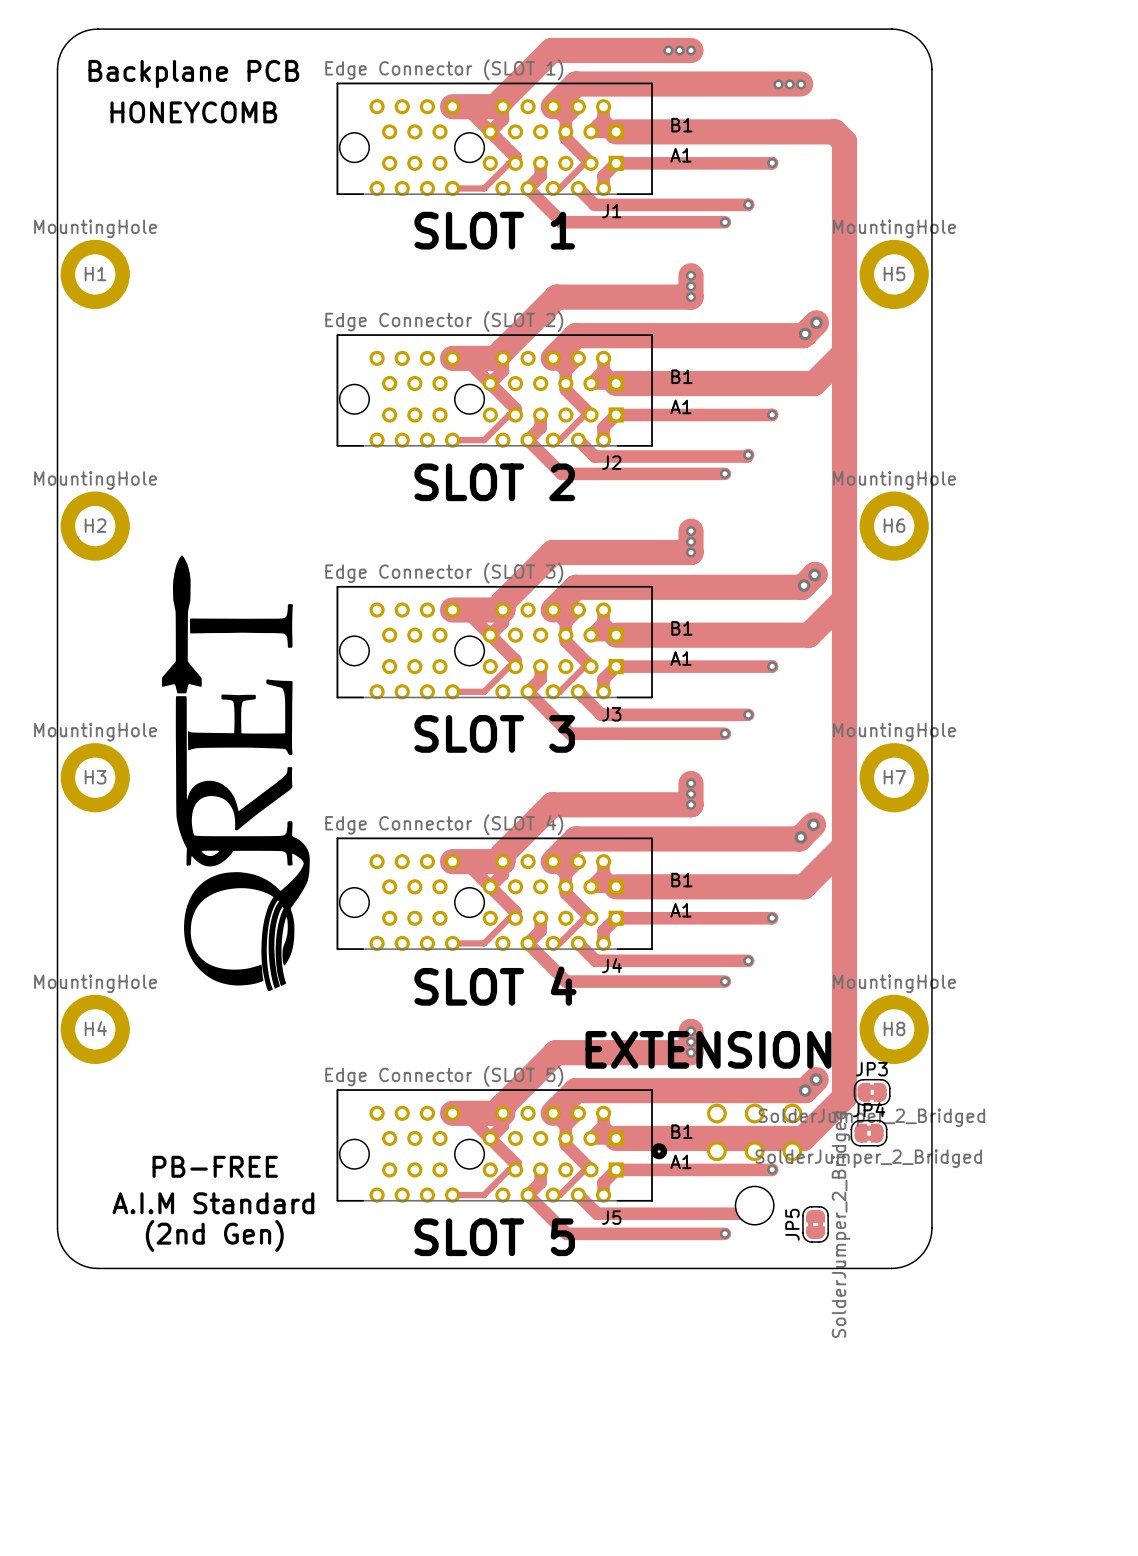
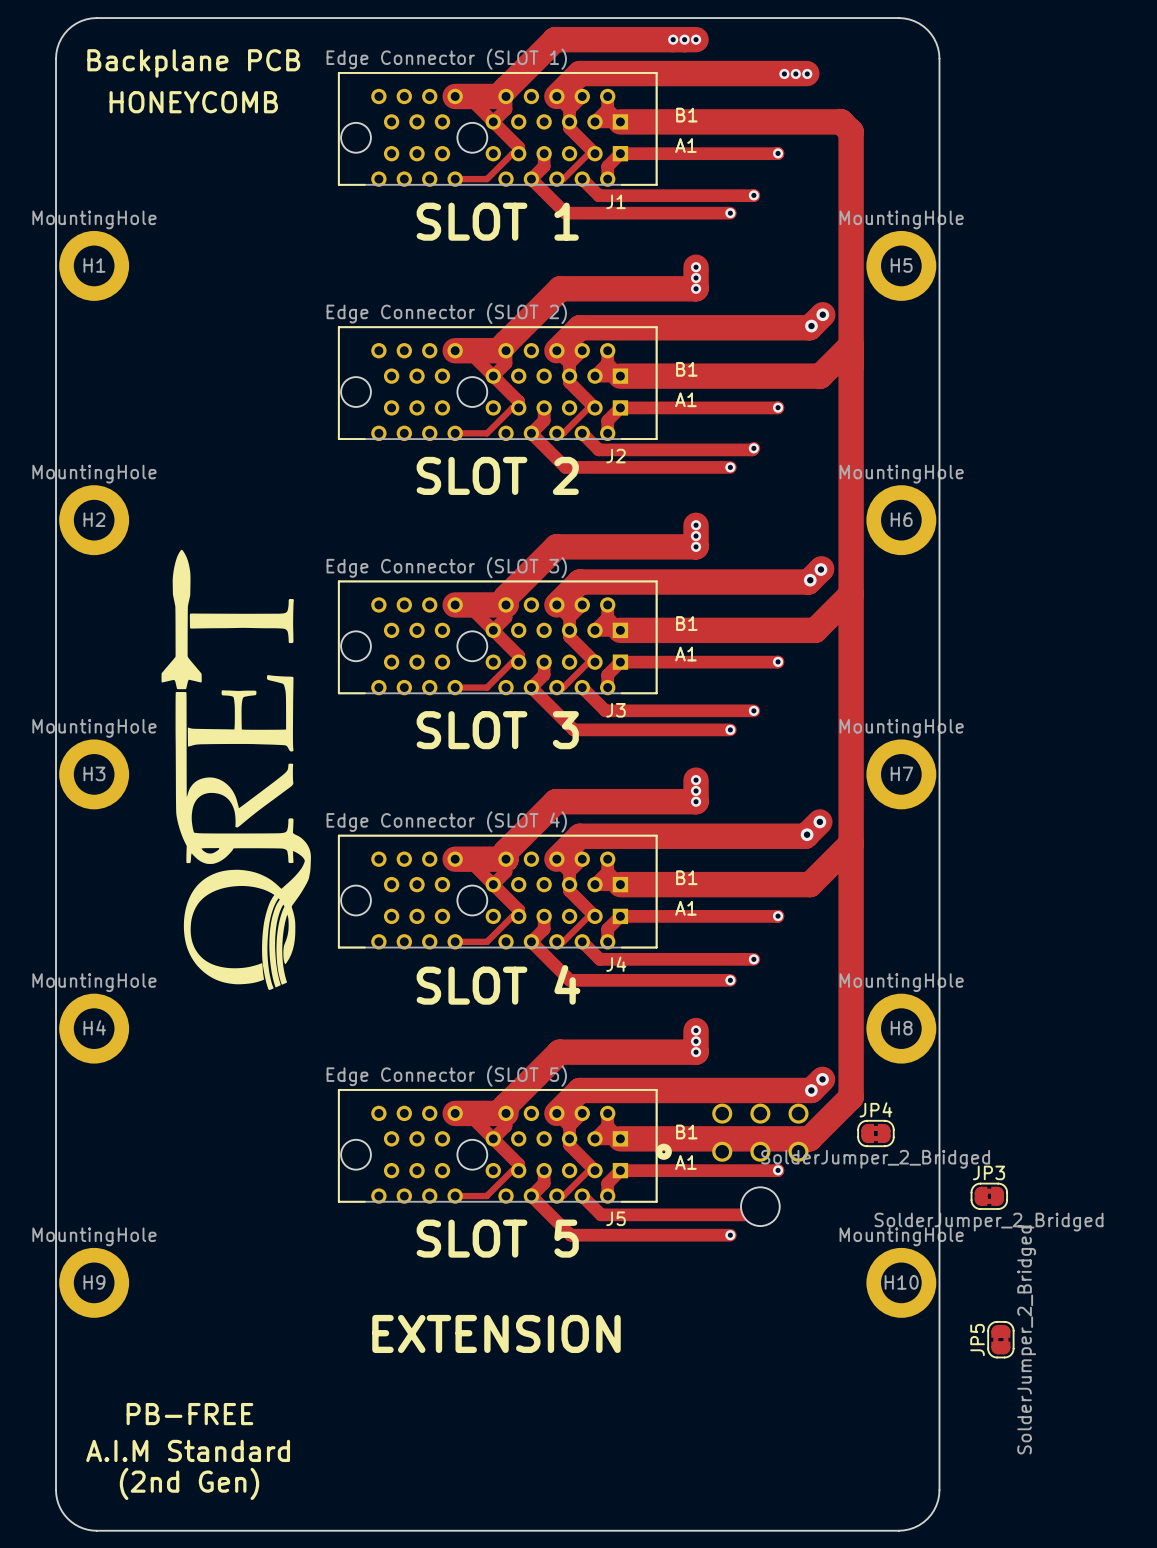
text: EXTENSION (708, 1049) -> none
JP3 position: (872, 1092) -> (989, 1196)
text position: PB-FREE (215, 1166) -> PB-FREE (189, 1414)
text position: A.I.M Standard (213, 1203) -> A.I.M Standard (188, 1450)
JP5 position: (815, 1224) -> (1000, 1339)
board edge: (57, 1228) (59, 1241) (69, 1256) (80, 1264) (97, 1268) (891, 1268) (907, 1265) (920, 1256) (928, 1243) (931, 1228) -> (56, 1229) (56, 1494) (60, 1507) (71, 1521) (83, 1528) (96, 1530) (898, 1530) (914, 1527) (931, 1514) (939, 1495) (939, 1229)
text position: (2nd Gen) (214, 1235) -> (2nd Gen) (189, 1483)
H9: none -> MountingHole (94, 1282)
H10: none -> MountingHole (901, 1282)
text: none -> EXTENSION (496, 1333)

